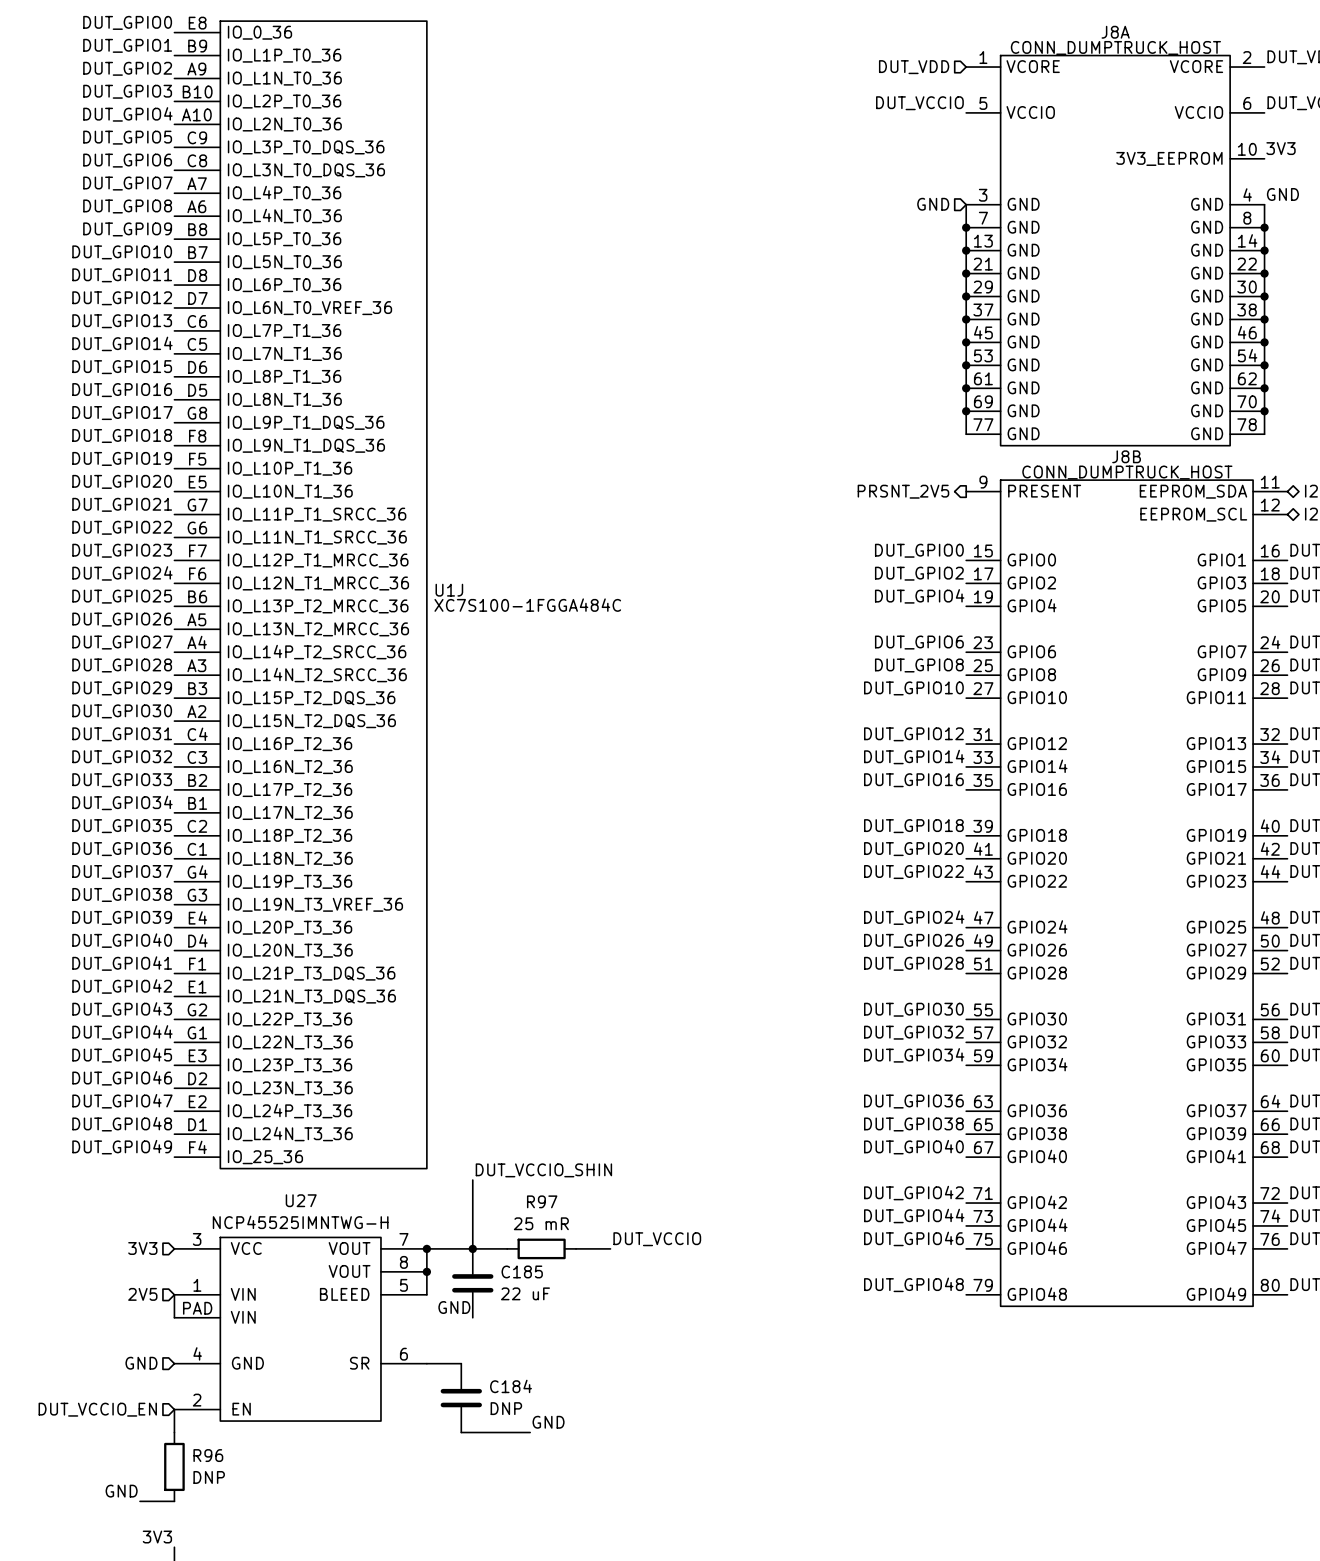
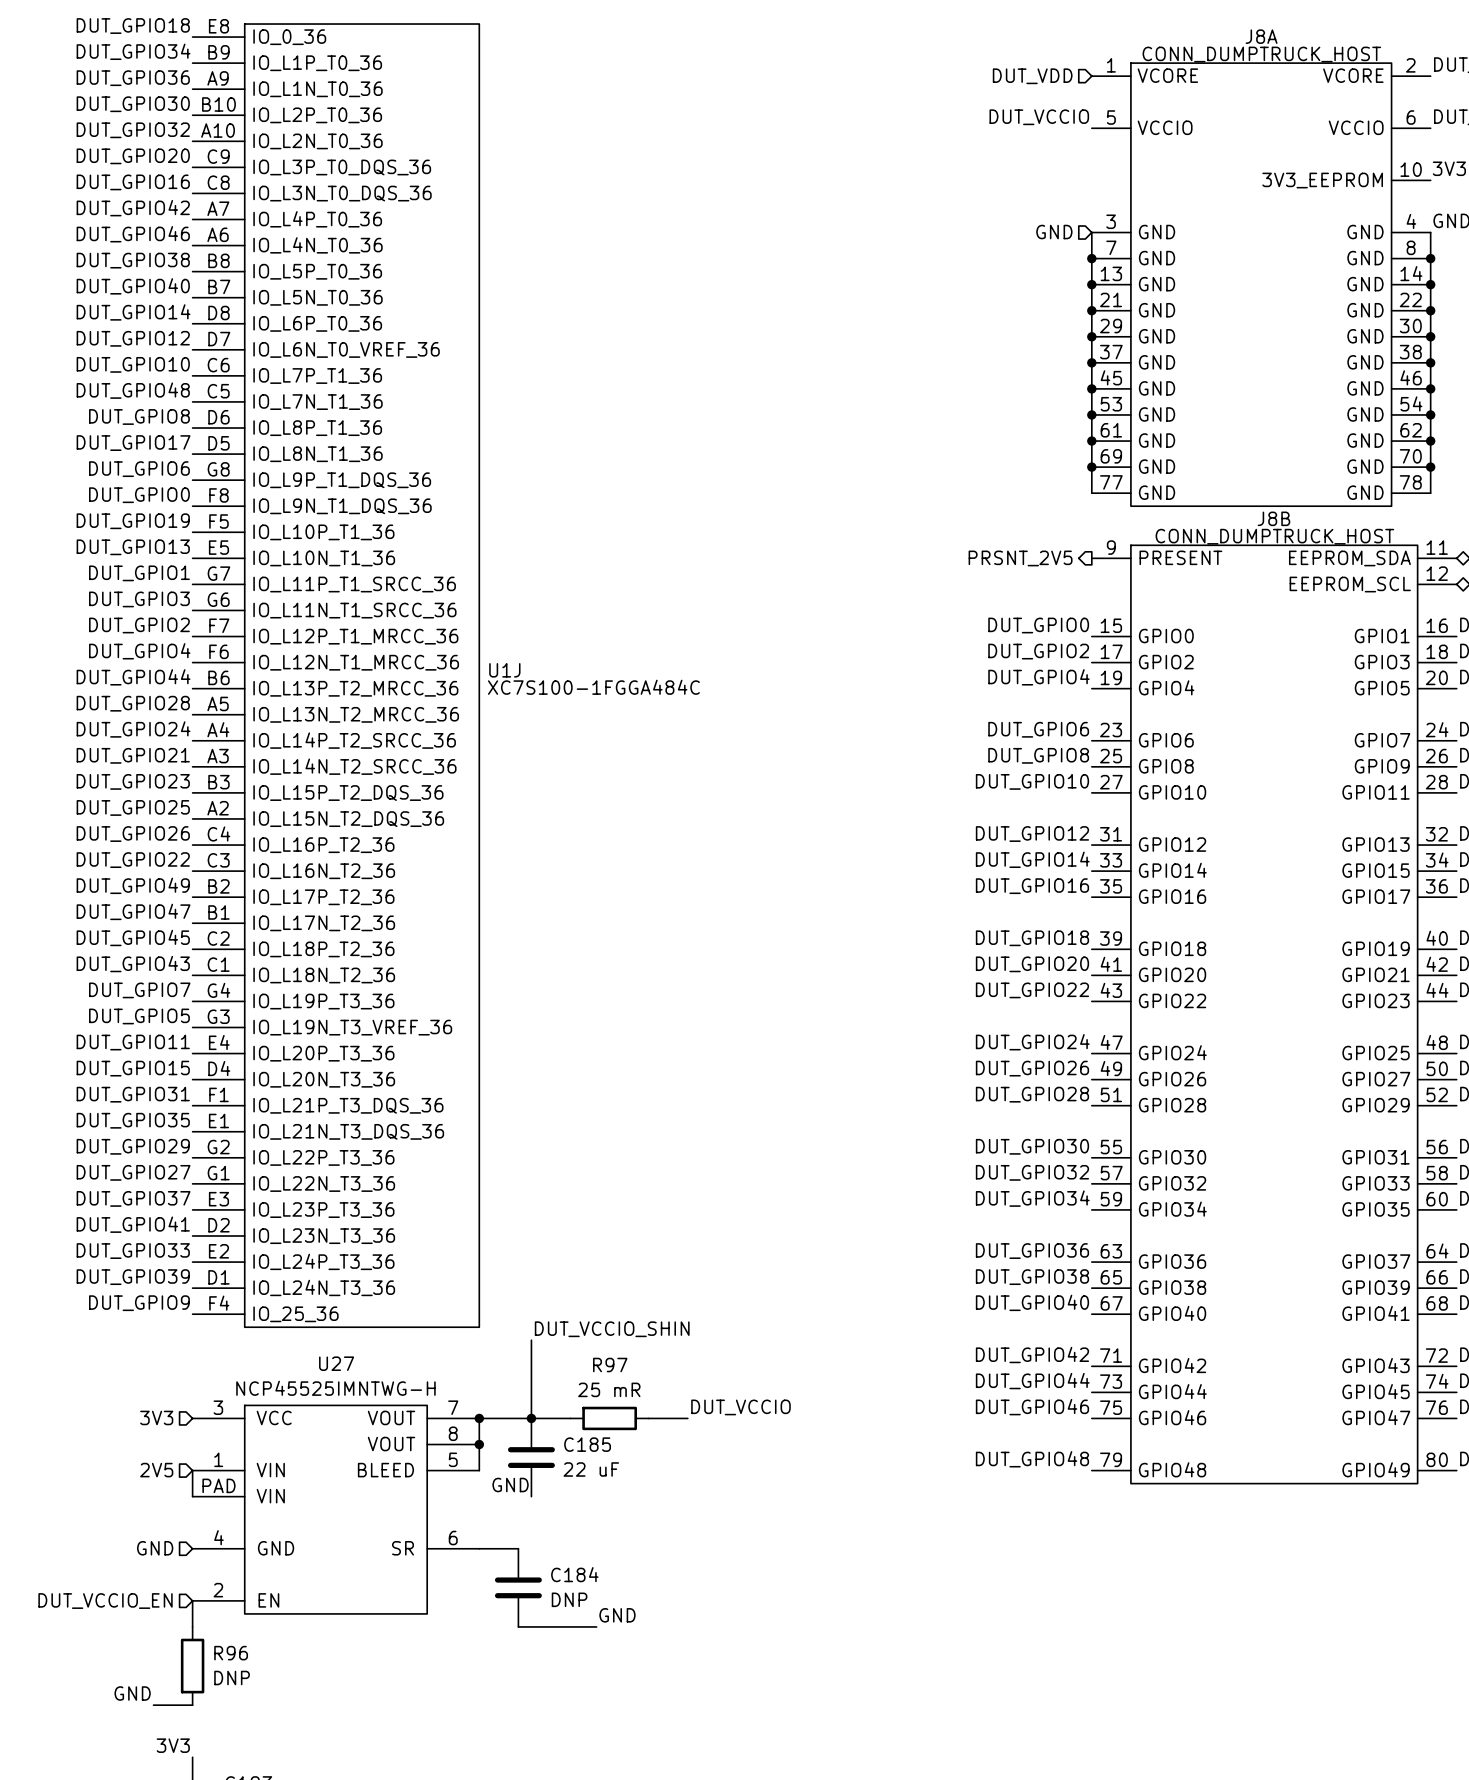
label: DUT_GPIO0 (127, 22) -> DUT_GPIO18 (133, 26)
label: DUT_GPIO1 (127, 45) -> DUT_GPIO34 (133, 51)
label: DUT_GPIO2 (127, 68) -> DUT_GPIO36 (133, 78)
label: DUT_GPIO3 (127, 91) -> DUT_GPIO30 (133, 104)
label: DUT_GPIO4 (127, 114) -> DUT_GPIO32 (133, 130)
label: DUT_GPIO5 (127, 137) -> DUT_GPIO20 (133, 156)
label: DUT_GPIO6 (127, 160) -> DUT_GPIO16 (133, 182)
label: DUT_GPIO7 (127, 183) -> DUT_GPIO42 (133, 208)
label: DUT_GPIO8 (127, 206) -> DUT_GPIO46 (133, 234)
label: DUT_GPIO9 (127, 229) -> DUT_GPIO38 (133, 260)
label: DUT_GPIO10 (122, 252) -> DUT_GPIO40 (133, 286)
label: DUT_GPIO11 (122, 275) -> DUT_GPIO14 (133, 312)
label: DUT_GPIO13 (122, 321) -> DUT_GPIO10 (133, 364)
label: DUT_GPIO14 (122, 343) -> DUT_GPIO48 (133, 390)
label: DUT_GPIO15 (122, 367) -> DUT_GPIO8 (139, 417)
label: DUT_GPIO16 (122, 390) -> DUT_GPIO17 (133, 443)
label: DUT_GPIO17 (122, 413) -> DUT_GPIO6 (139, 469)
label: DUT_GPIO18 (122, 435) -> DUT_GPIO0 (139, 495)
label: DUT_GPIO20 (122, 481) -> DUT_GPIO13 (133, 547)
label: DUT_GPIO21 (122, 504) -> DUT_GPIO1 (139, 573)
label: DUT_GPIO22 (122, 527) -> DUT_GPIO3 (139, 599)
label: DUT_GPIO23 (122, 550) -> DUT_GPIO2 (139, 625)
label: DUT_GPIO24 (122, 573) -> DUT_GPIO4 (139, 651)
label: DUT_GPIO25 (122, 596) -> DUT_GPIO44 (133, 677)
label: DUT_GPIO26 (122, 619) -> DUT_GPIO28 (133, 703)
label: DUT_GPIO27 (122, 642) -> DUT_GPIO24 (133, 729)
label: DUT_GPIO28 (122, 665) -> DUT_GPIO21 (133, 755)
label: DUT_GPIO29 (122, 688) -> DUT_GPIO23 (133, 781)
label: DUT_GPIO30 (122, 711) -> DUT_GPIO25 (133, 807)
label: DUT_GPIO31 (122, 734) -> DUT_GPIO26 (133, 834)
label: DUT_GPIO32 (122, 757) -> DUT_GPIO22 (133, 860)
label: DUT_GPIO33 (122, 780) -> DUT_GPIO49 (133, 885)
label: DUT_GPIO34 (122, 802) -> DUT_GPIO47 (133, 911)
label: DUT_GPIO35 (122, 826) -> DUT_GPIO45 (133, 937)
label: DUT_GPIO36 (122, 849) -> DUT_GPIO43 (133, 964)
label: DUT_GPIO37 (122, 872) -> DUT_GPIO7 (139, 990)
label: DUT_GPIO38 (122, 894) -> DUT_GPIO5 (139, 1016)
label: DUT_GPIO39 (122, 917) -> DUT_GPIO11 (133, 1042)
label: DUT_GPIO40 (122, 940) -> DUT_GPIO15 (133, 1068)
label: DUT_GPIO41 (122, 963) -> DUT_GPIO31 (133, 1094)
label: DUT_GPIO42 (122, 986) -> DUT_GPIO35 (133, 1120)
label: DUT_GPIO43 (122, 1009) -> DUT_GPIO29 (133, 1146)
label: DUT_GPIO44 (122, 1032) -> DUT_GPIO27 (133, 1172)
label: DUT_GPIO45 (122, 1055) -> DUT_GPIO37 (133, 1198)
label: DUT_GPIO46 (122, 1078) -> DUT_GPIO41 (133, 1224)
label: DUT_GPIO47 (122, 1101) -> DUT_GPIO33 (133, 1251)
label: DUT_GPIO48 (122, 1124) -> DUT_GPIO39 (133, 1277)
label: DUT_GPIO49 (122, 1147) -> DUT_GPIO9 (139, 1303)

